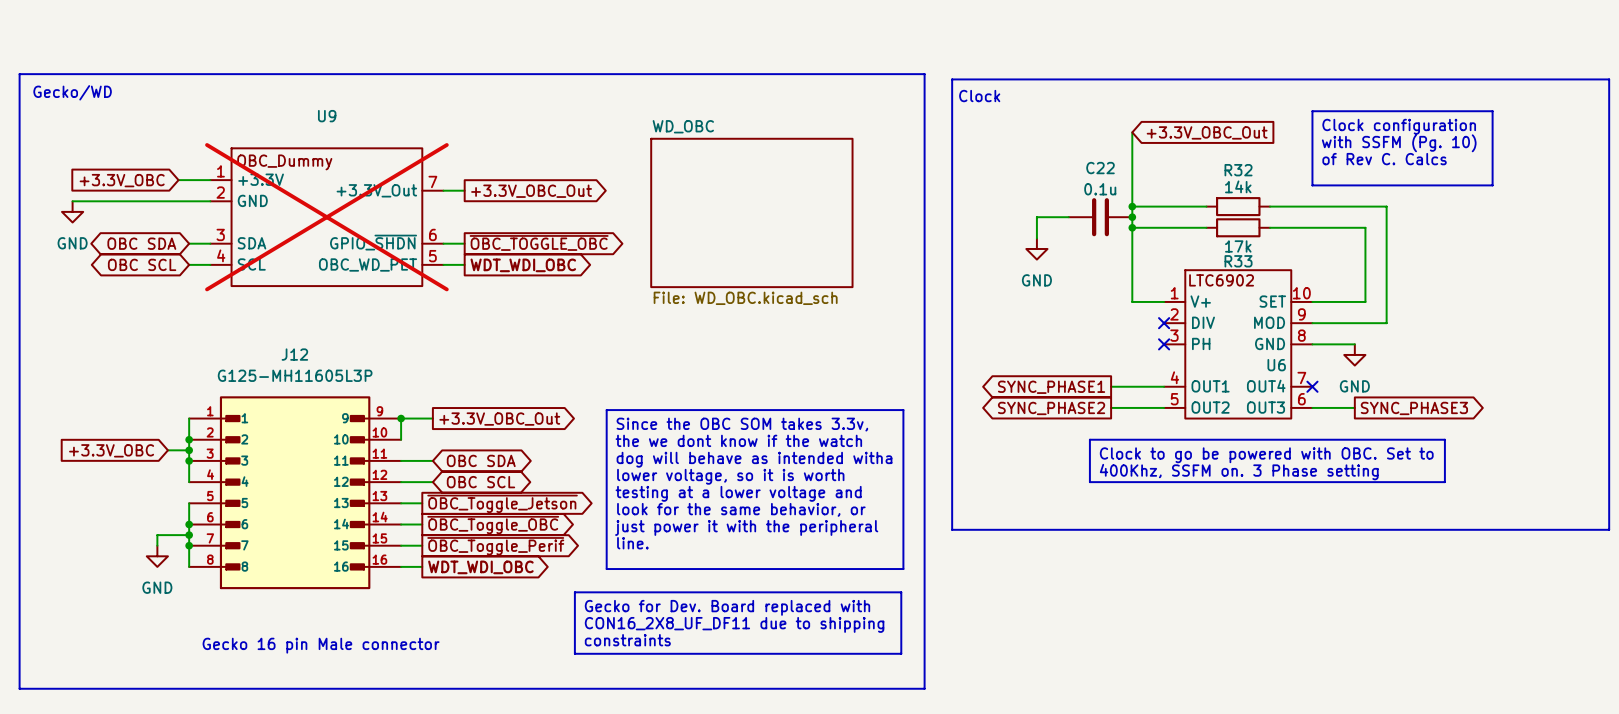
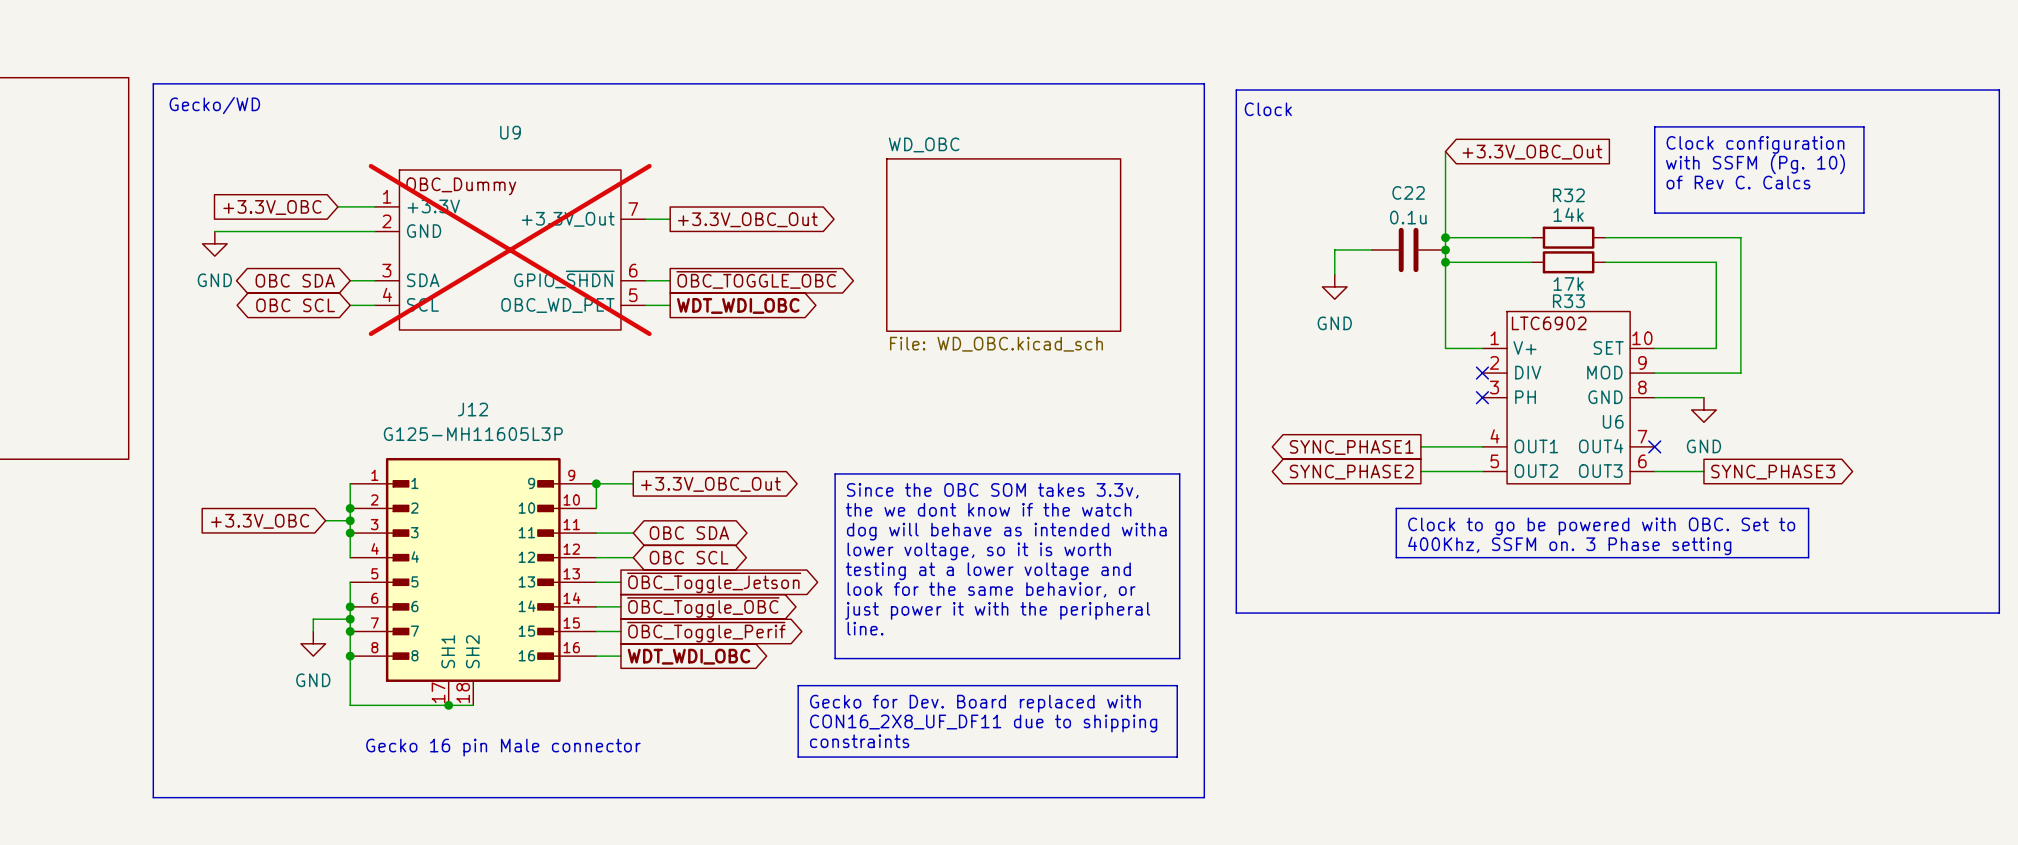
J12 symbol: [189, 396, 402, 590] -> [350, 457, 597, 706]
wire: none -> (350, 656) (350, 705) (473, 705)
junction: none -> (350, 656)
junction: none -> (448, 705)

